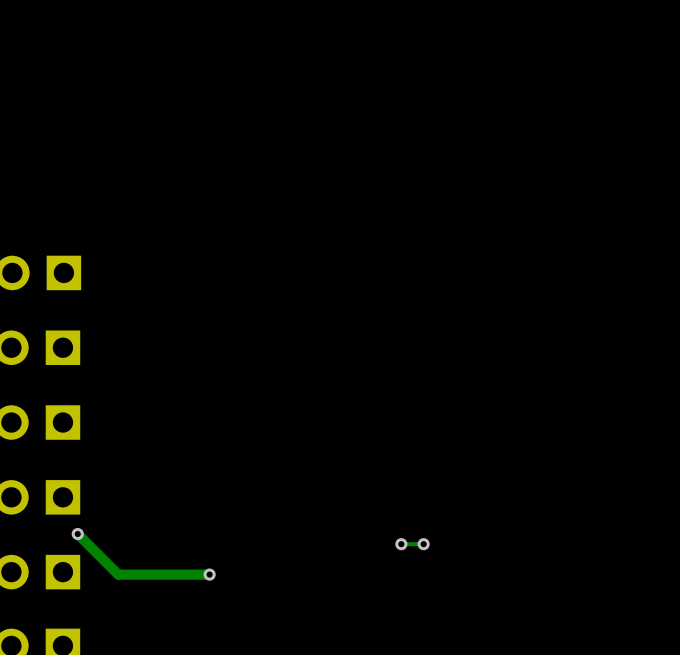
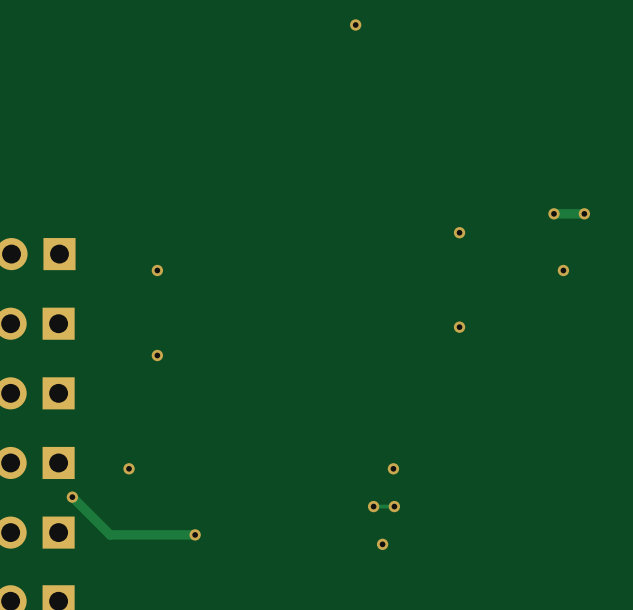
via: none -> (355, 24)
via: none -> (553, 213)
track: none -> (584, 213) (553, 213)
via: none -> (584, 213)
via: none -> (459, 232)
via: none -> (157, 270)
via: none -> (563, 270)
via: none -> (459, 327)
via: none -> (157, 355)
via: none -> (129, 468)
via: none -> (393, 468)
via: none -> (382, 544)

